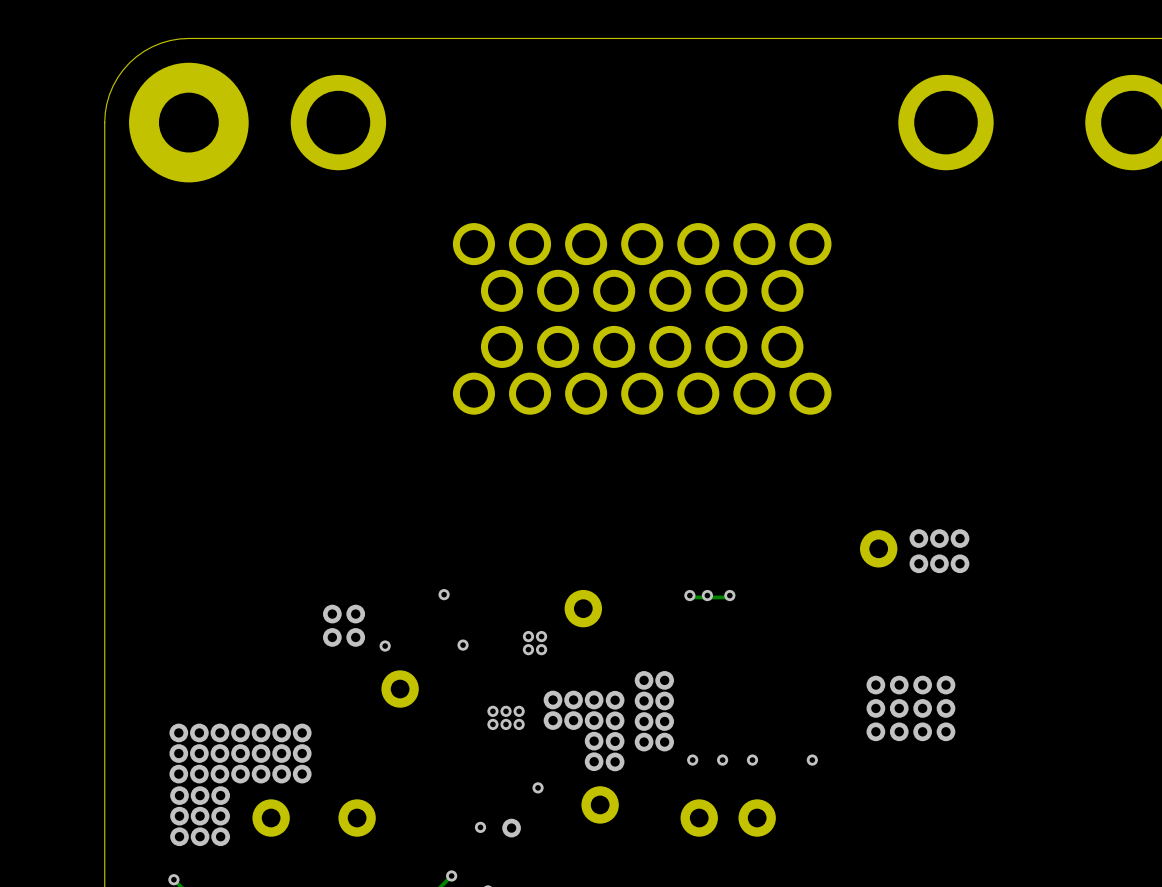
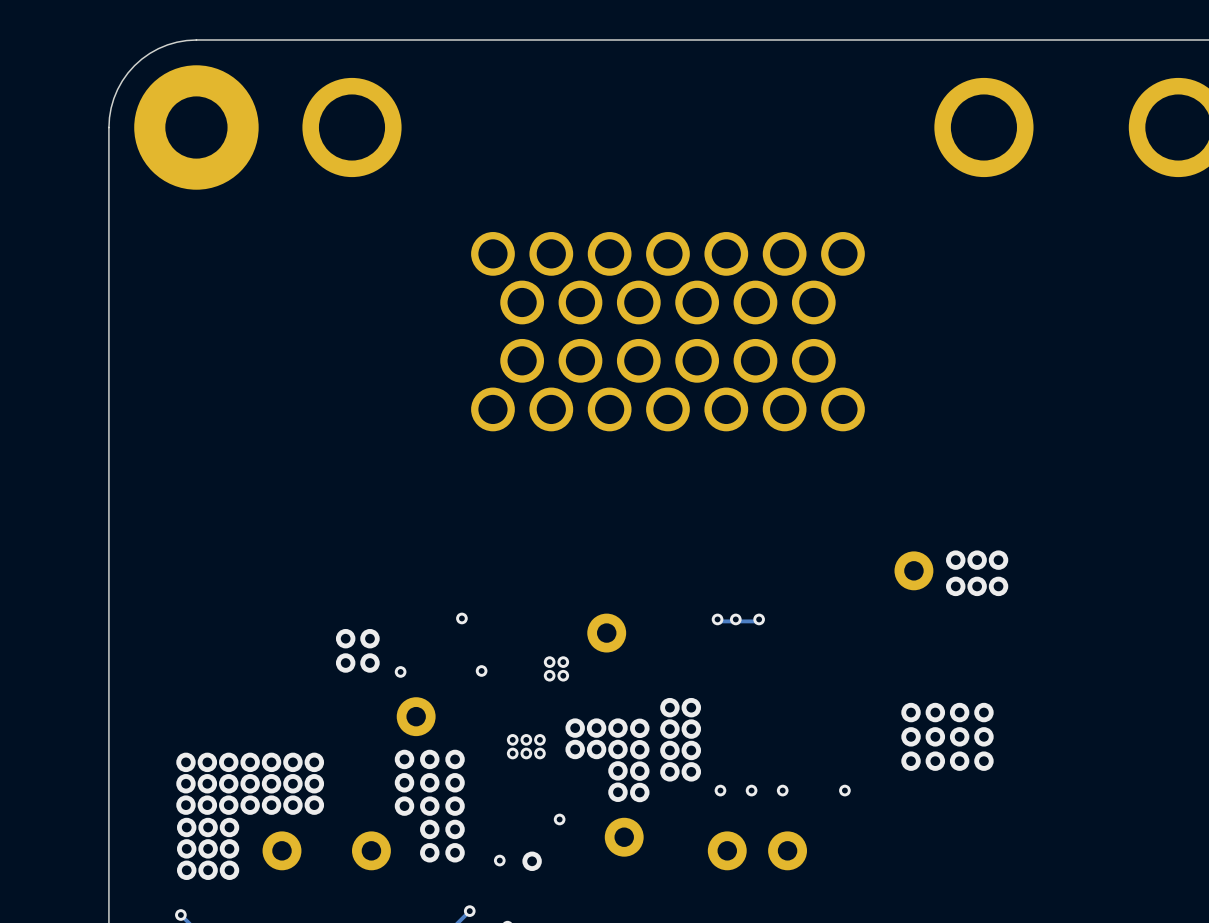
via: none -> (404, 759)
via: none -> (429, 759)
via: none -> (455, 759)
via: none -> (404, 782)
via: none -> (429, 782)
via: none -> (455, 782)
via: none -> (404, 806)
via: none -> (429, 806)
via: none -> (455, 806)
via: none -> (429, 829)
via: none -> (455, 829)
via: none -> (429, 852)
via: none -> (455, 852)

